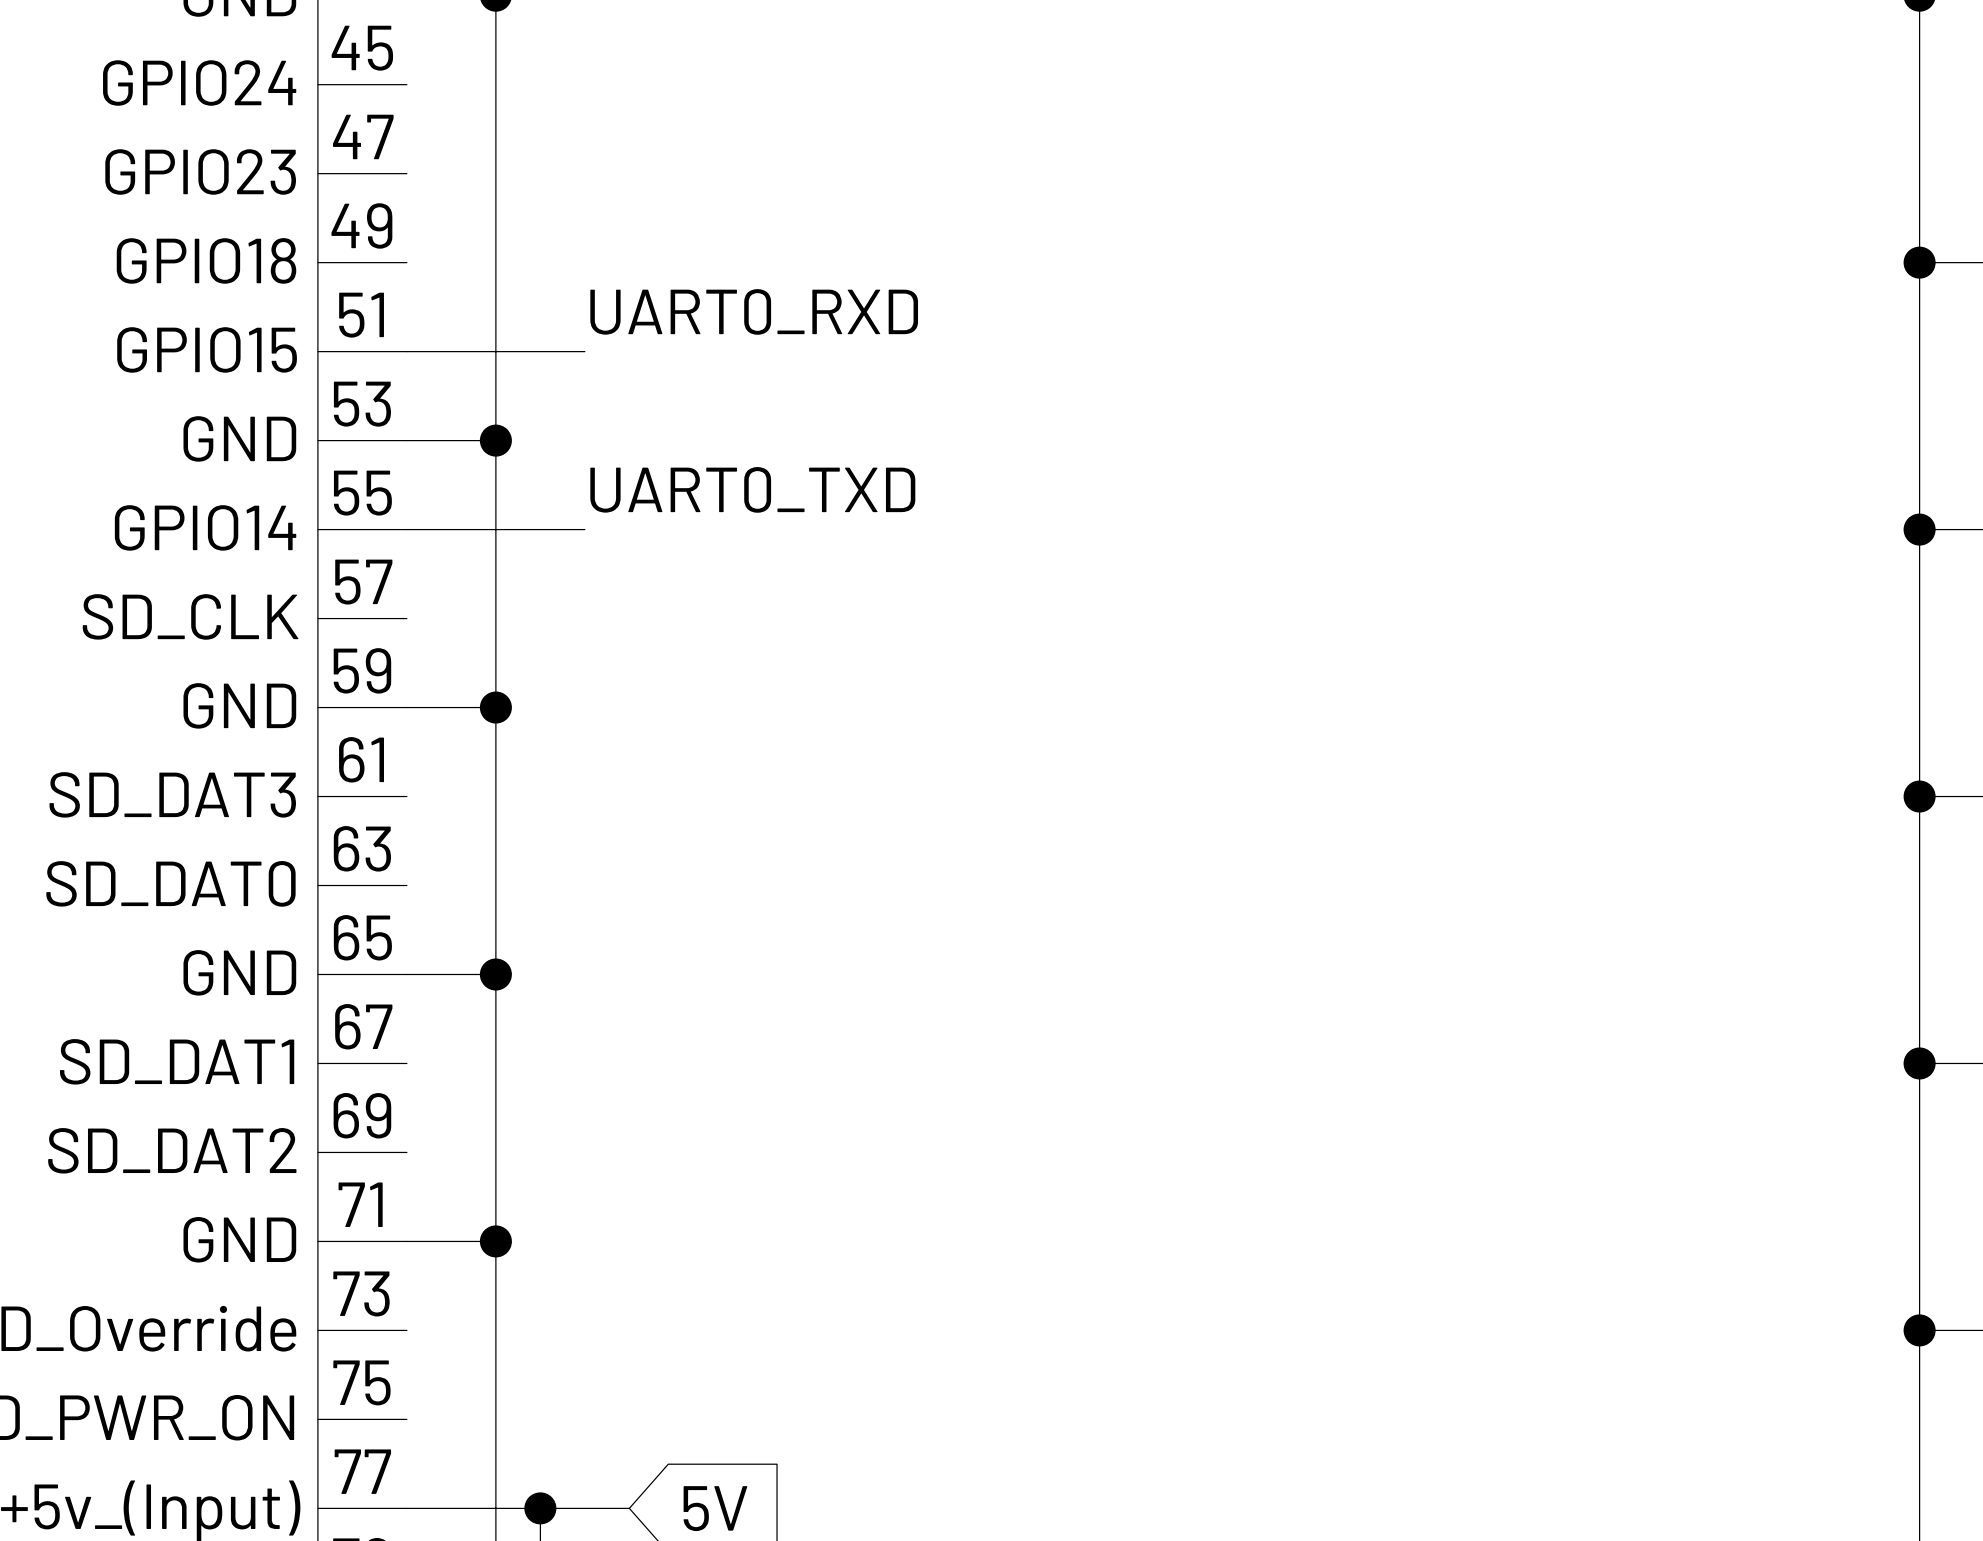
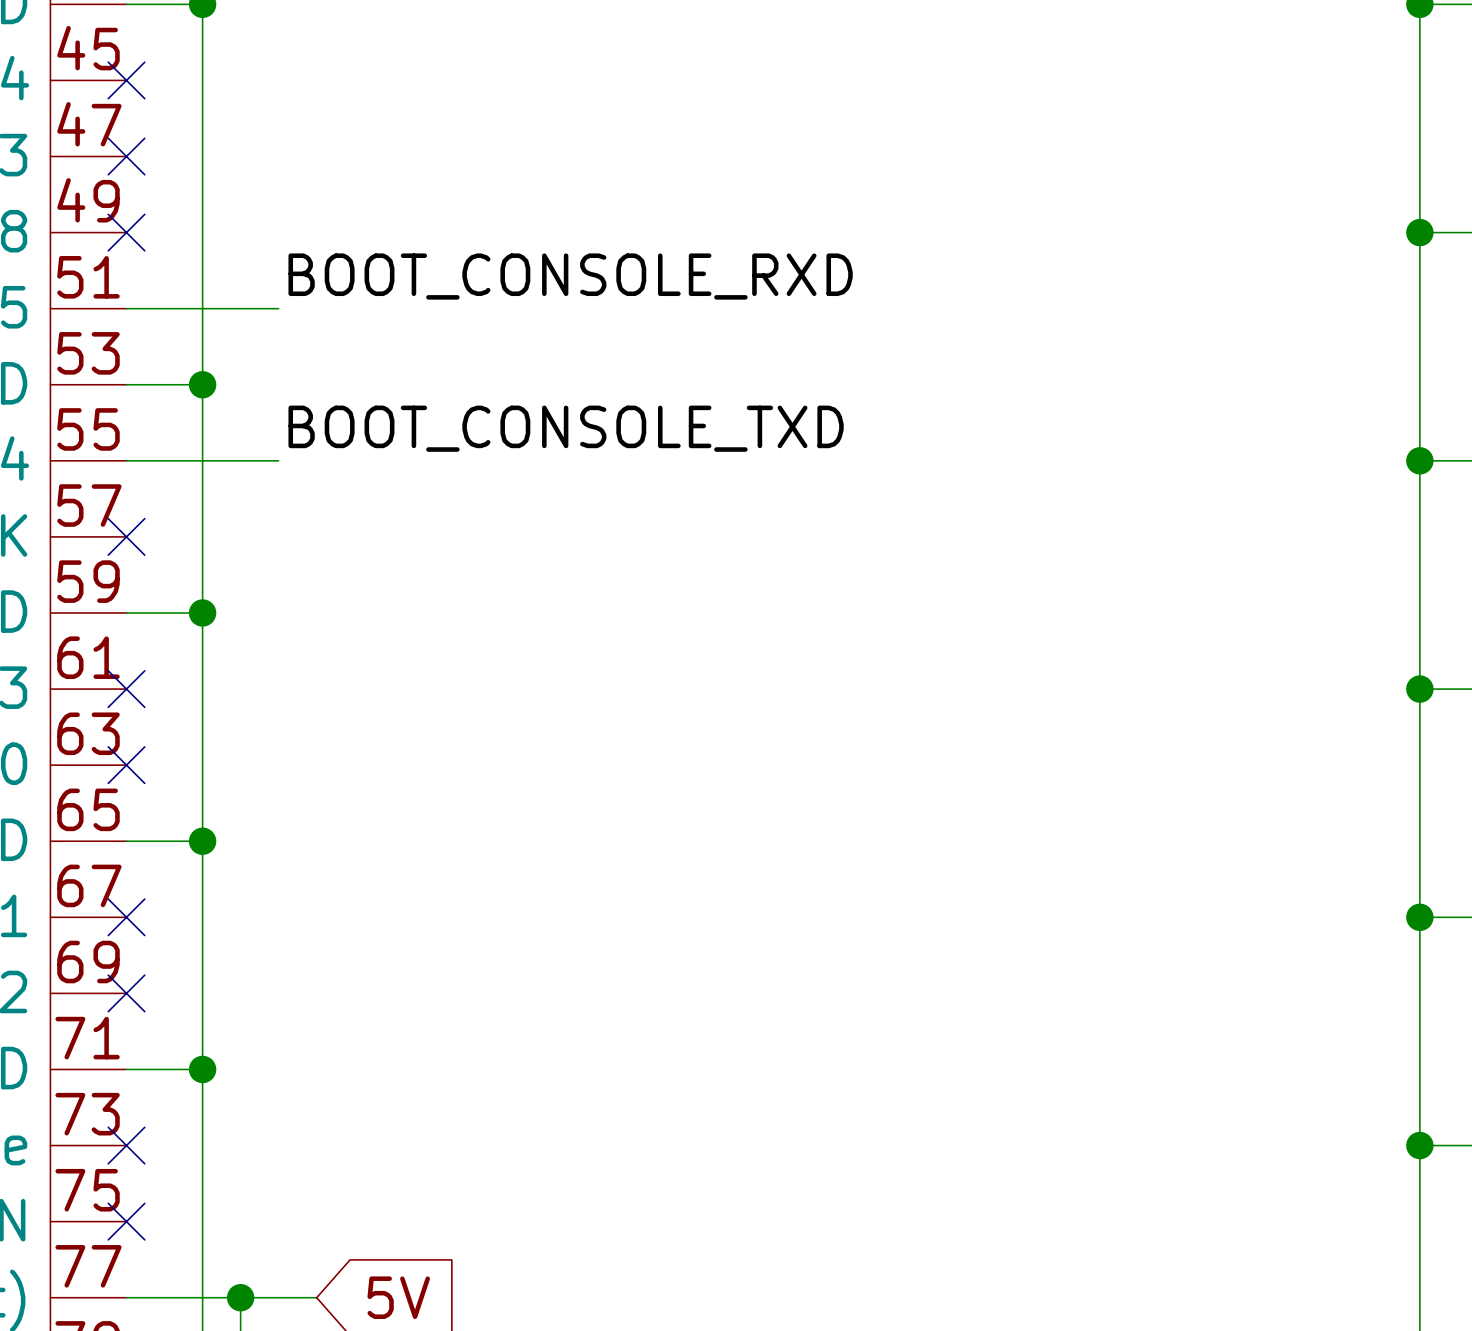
no-connect mark: none -> (126, 80)
no-connect mark: none -> (126, 156)
no-connect mark: none -> (126, 232)
label: UART0_RXD (754, 311) -> BOOT_CONSOLE_RXD (570, 276)
label: UART0_TXD (752, 489) -> BOOT_CONSOLE_TXD (566, 428)
no-connect mark: none -> (126, 536)
no-connect mark: none -> (126, 689)
no-connect mark: none -> (126, 765)
no-connect mark: none -> (126, 917)
no-connect mark: none -> (126, 993)
no-connect mark: none -> (126, 1145)
no-connect mark: none -> (126, 1221)

